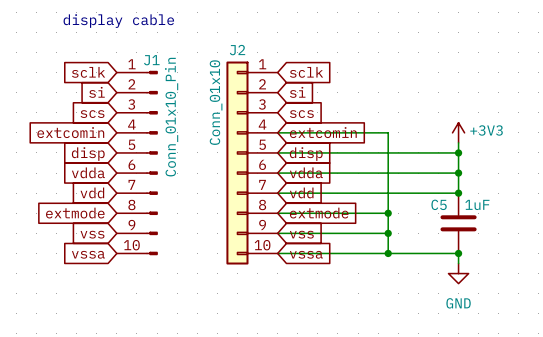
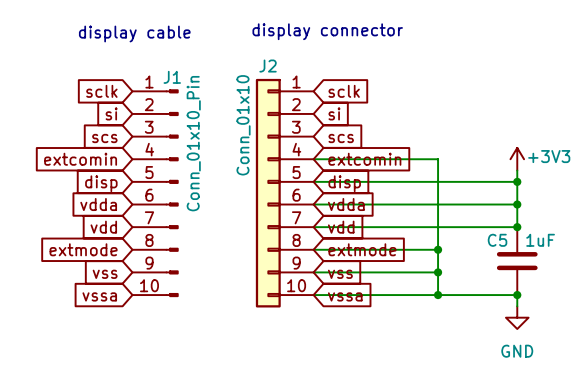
text: none -> display connector (327, 31)

